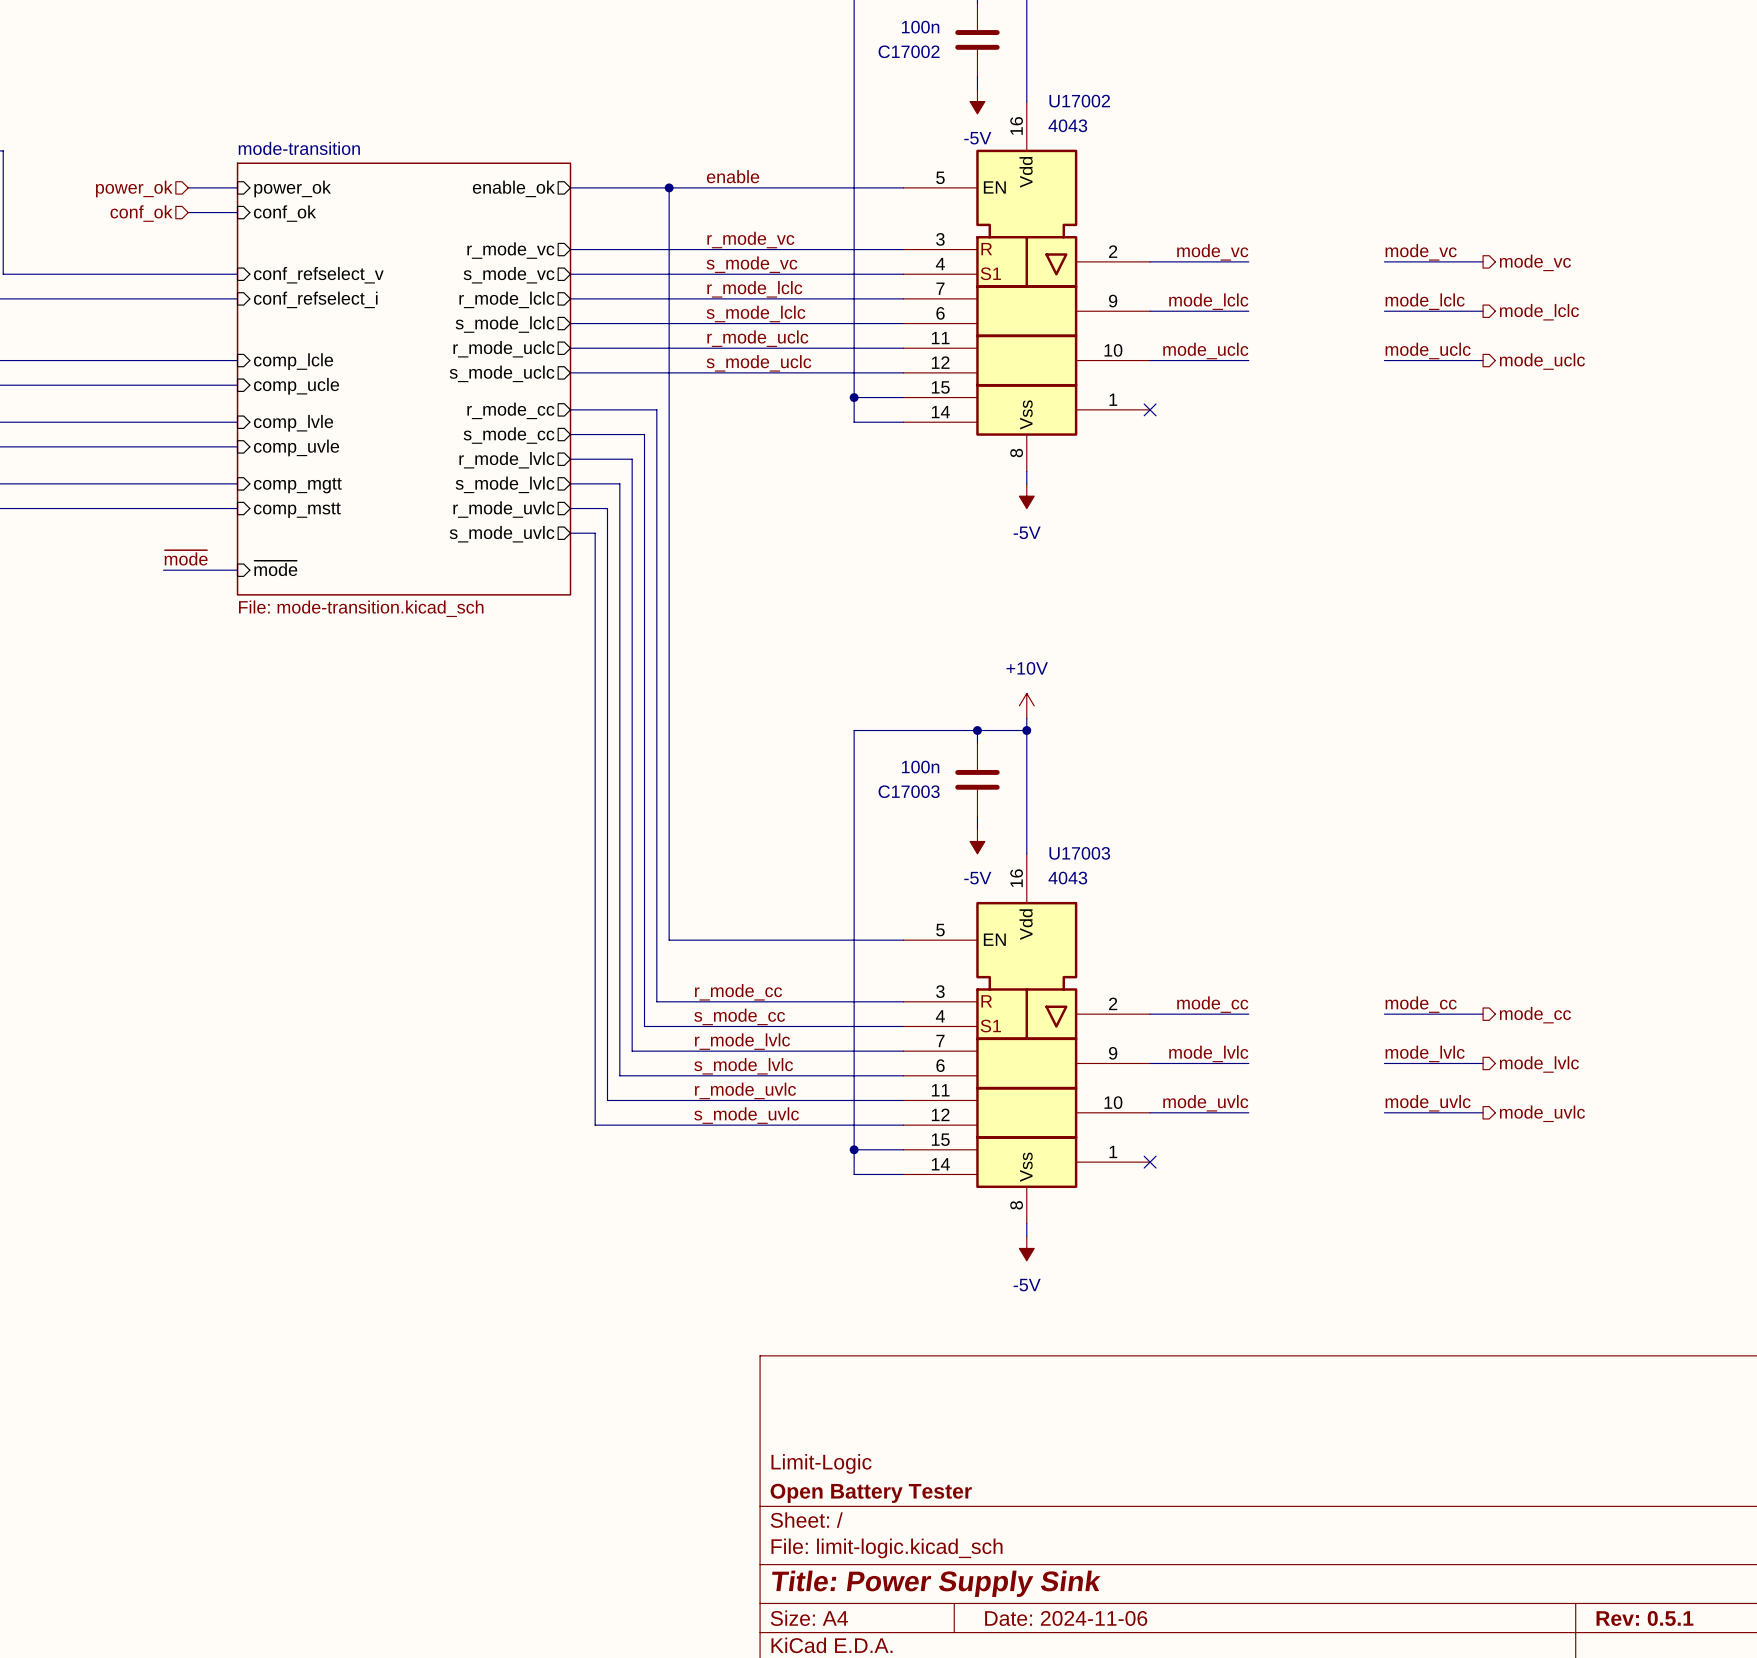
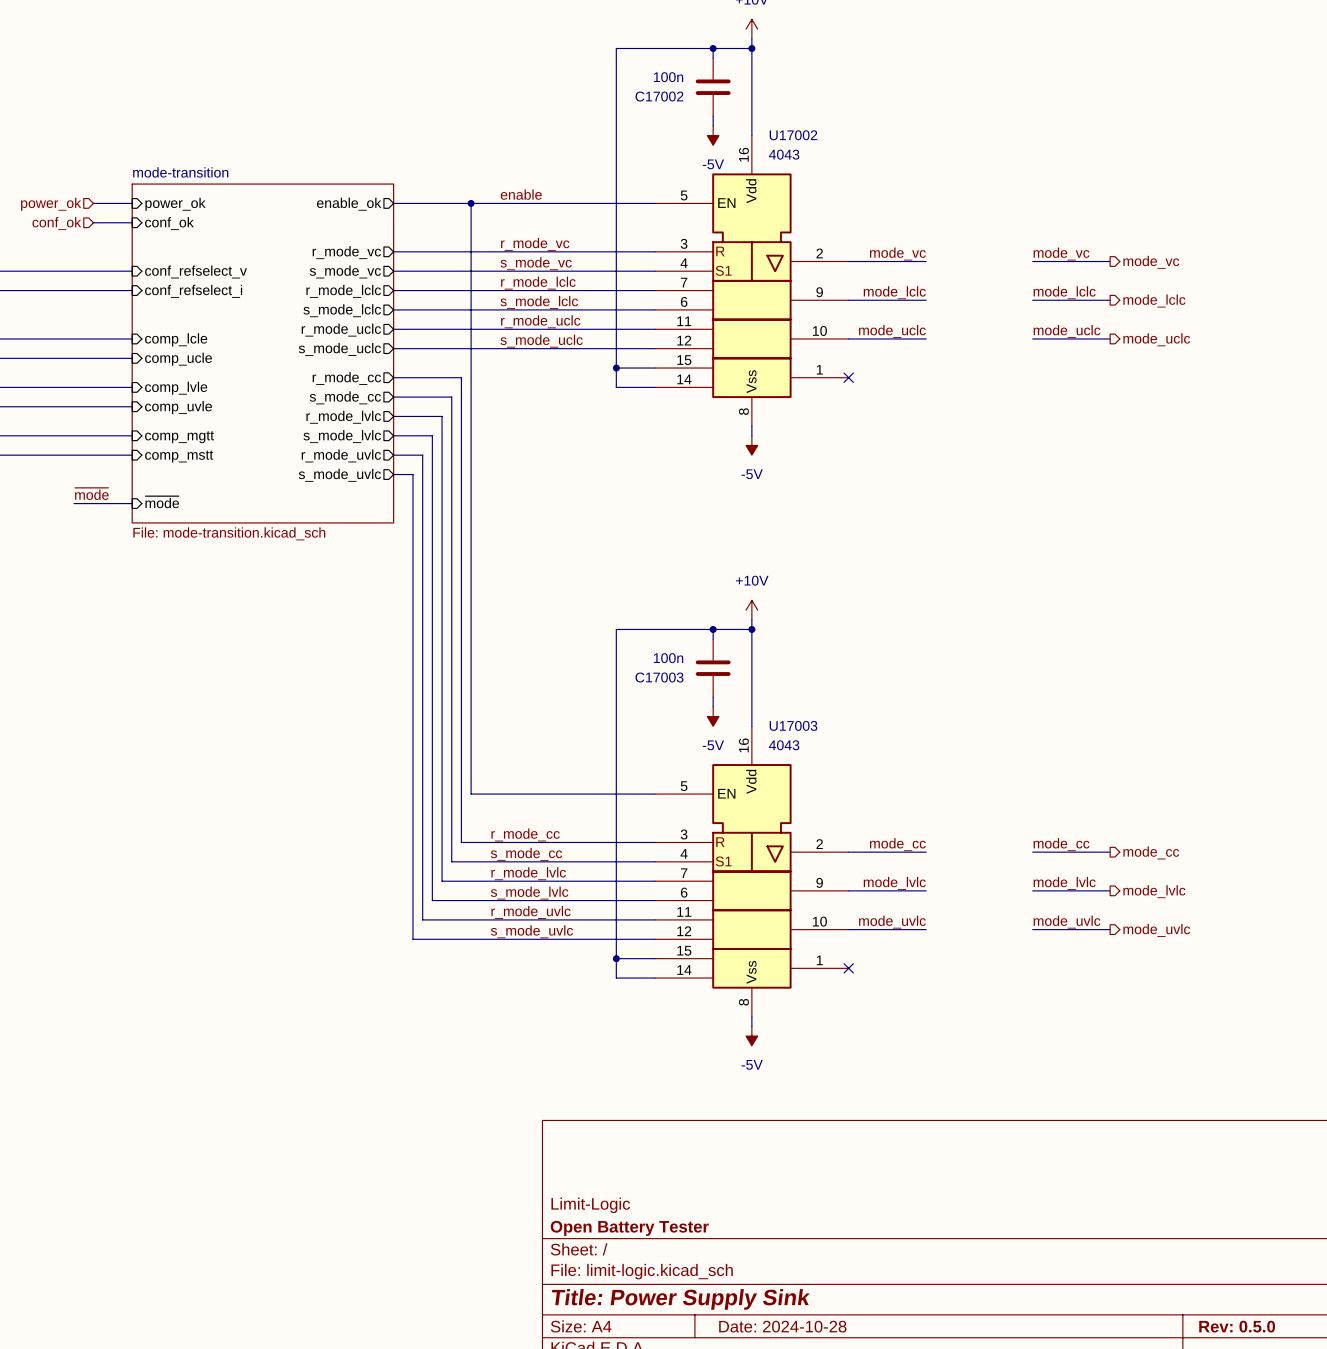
title block: Date: 2024-11-06 (1066, 1618) -> Date: 2024-10-28 (782, 1326)
title block: Rev: 0.5.1 (1644, 1618) -> Rev: 0.5.0 (1237, 1326)

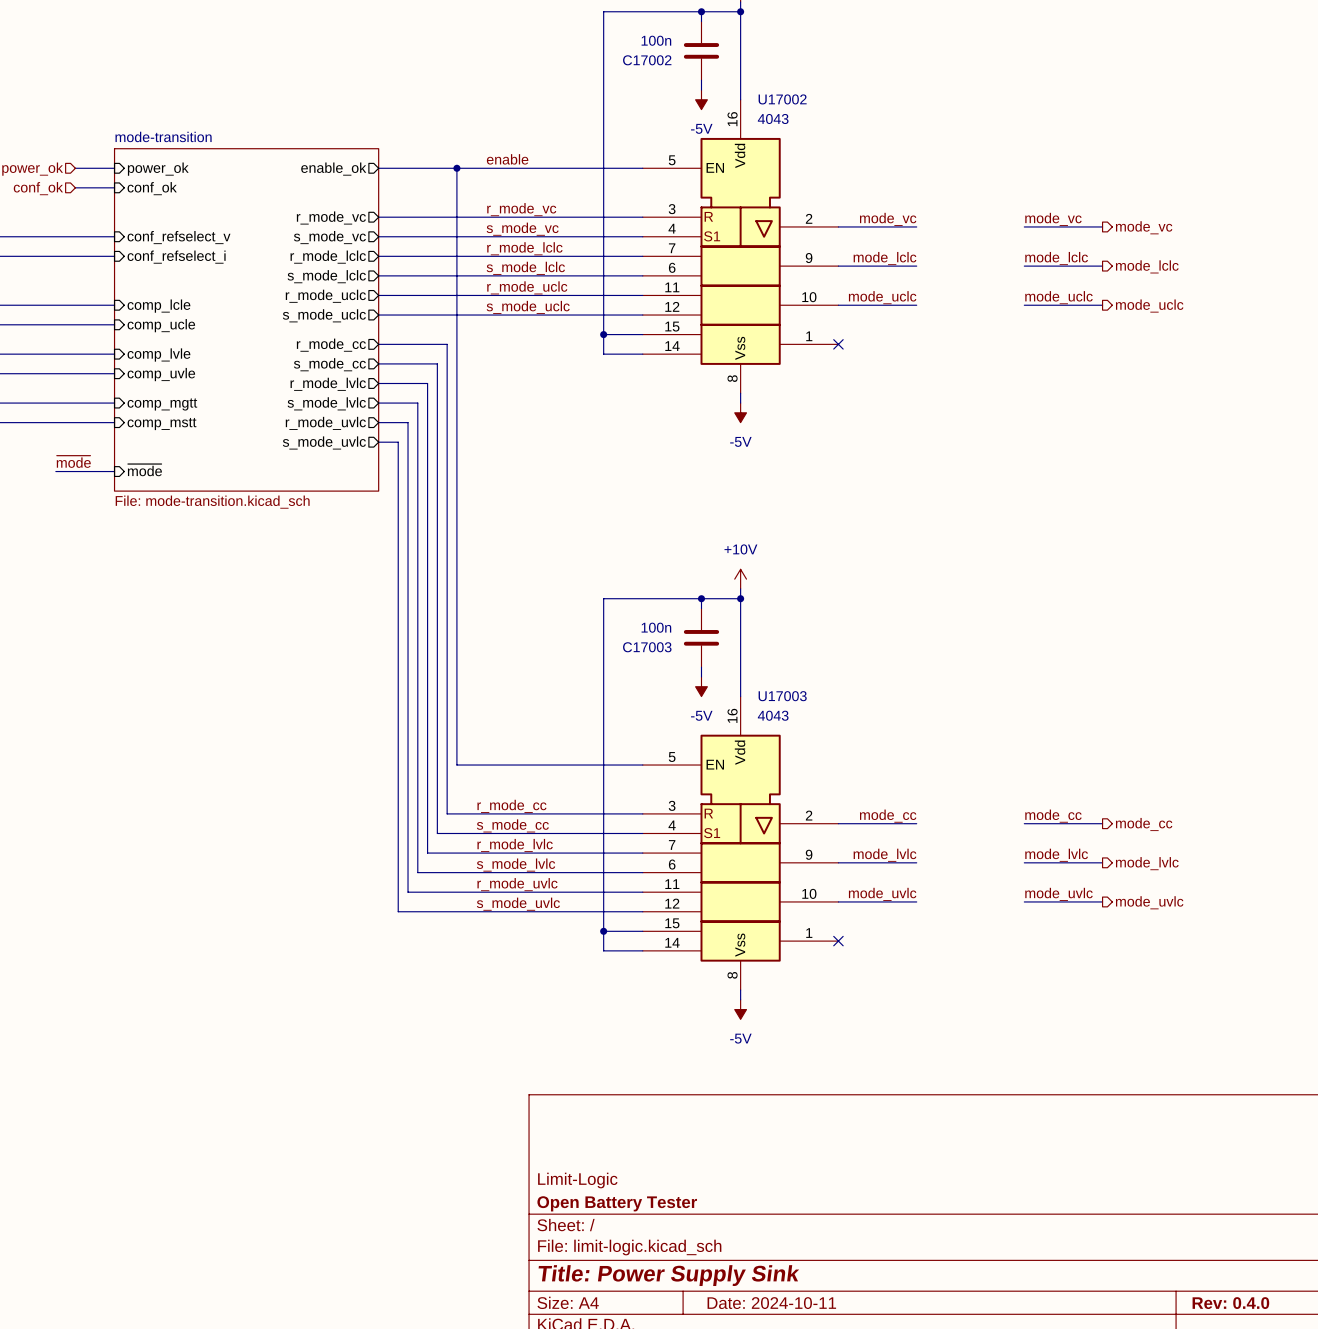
title block: Date: 2024-10-28 (782, 1326) -> Date: 2024-10-11 (771, 1303)
title block: Rev: 0.5.0 (1237, 1326) -> Rev: 0.4.0 (1230, 1303)

